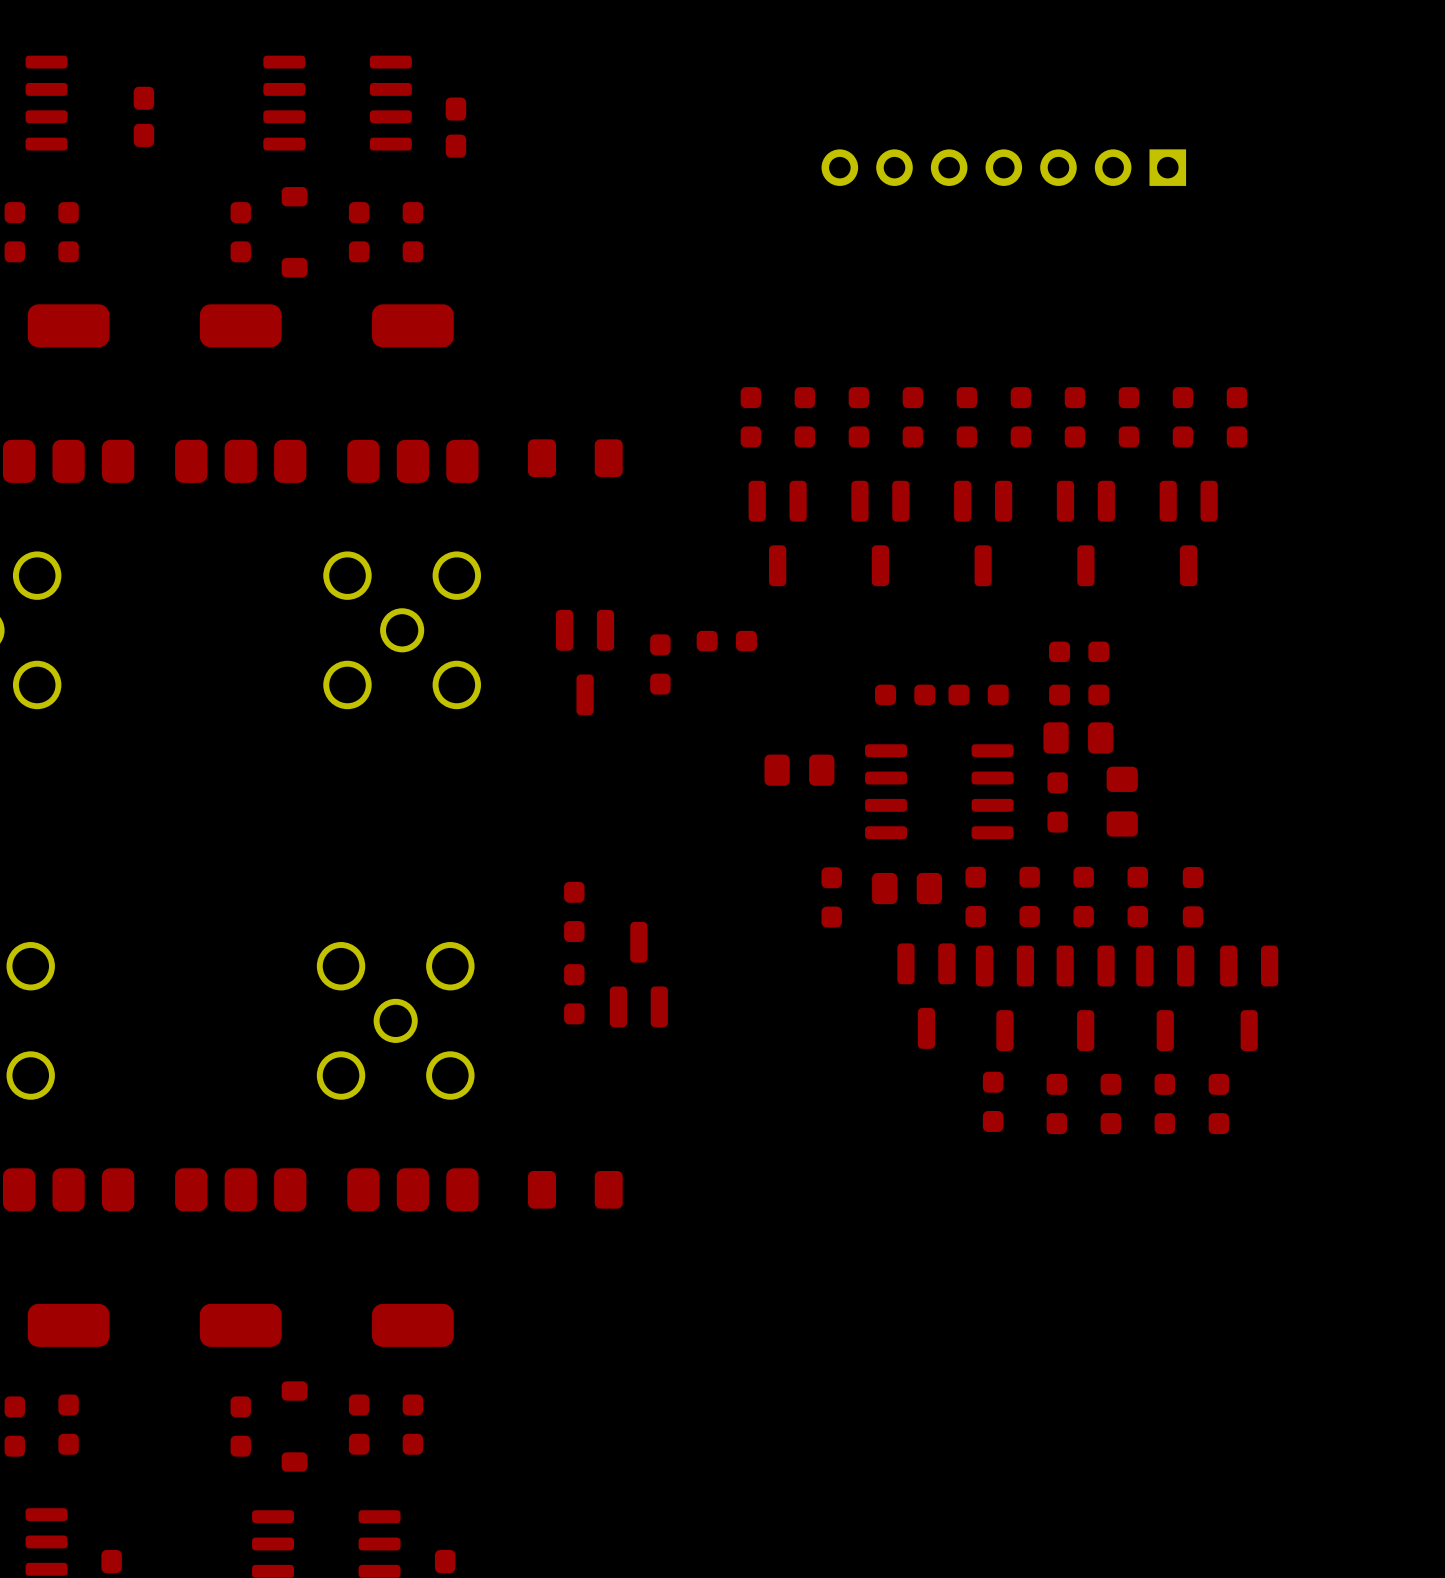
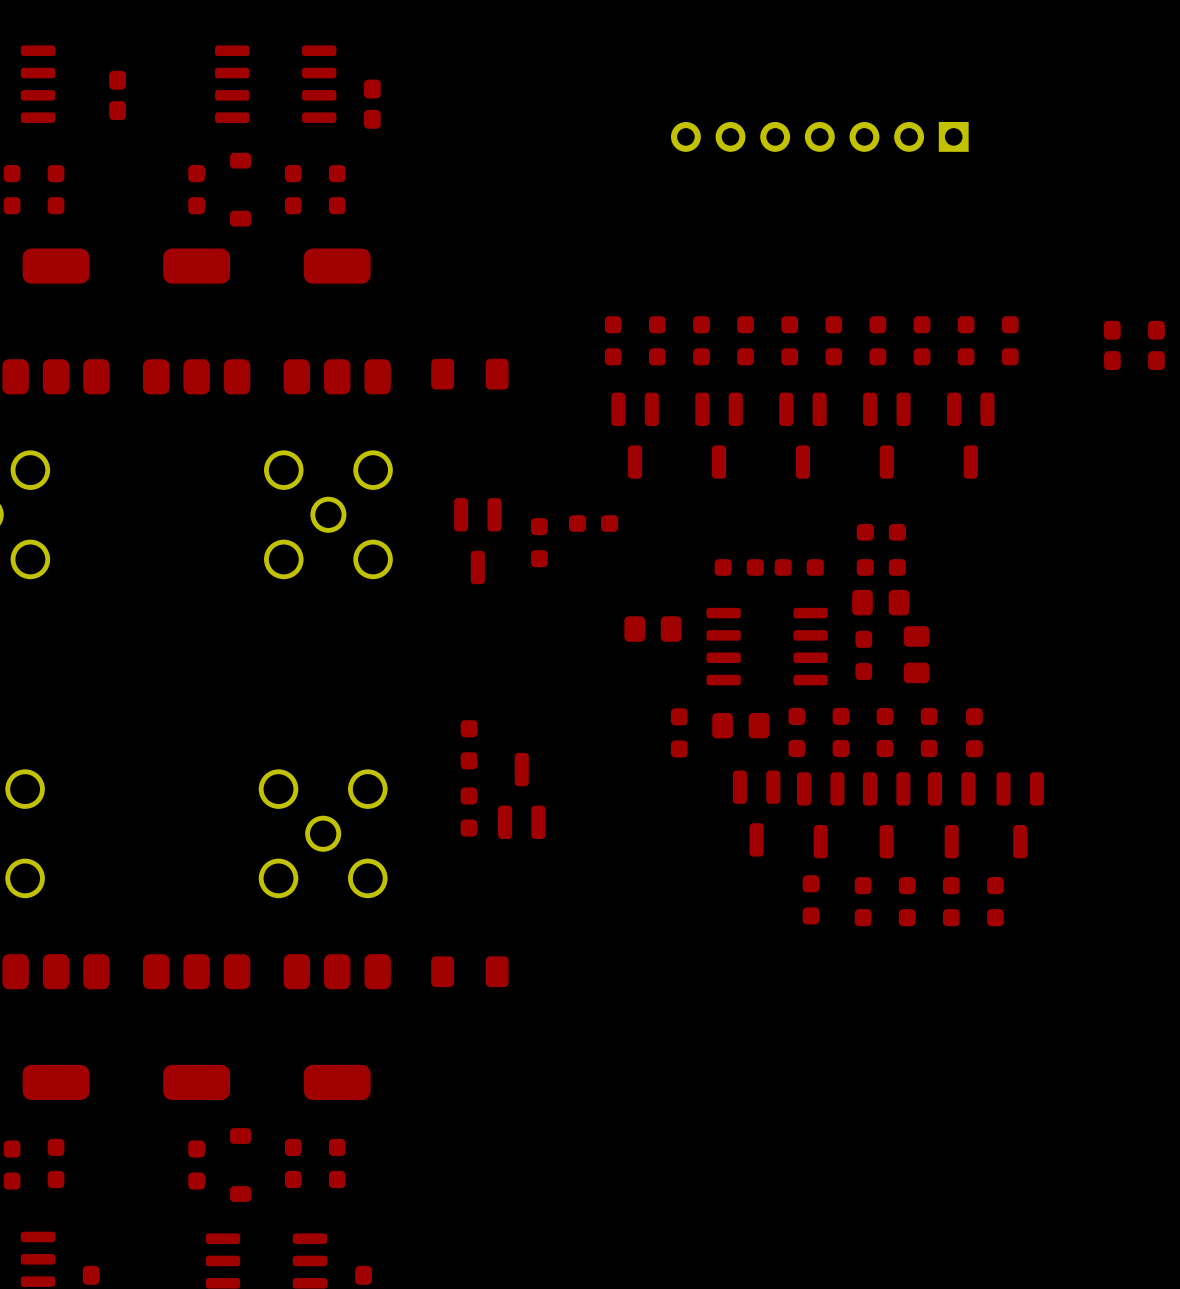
part: none -> (1112, 345)
part: none -> (1156, 345)

